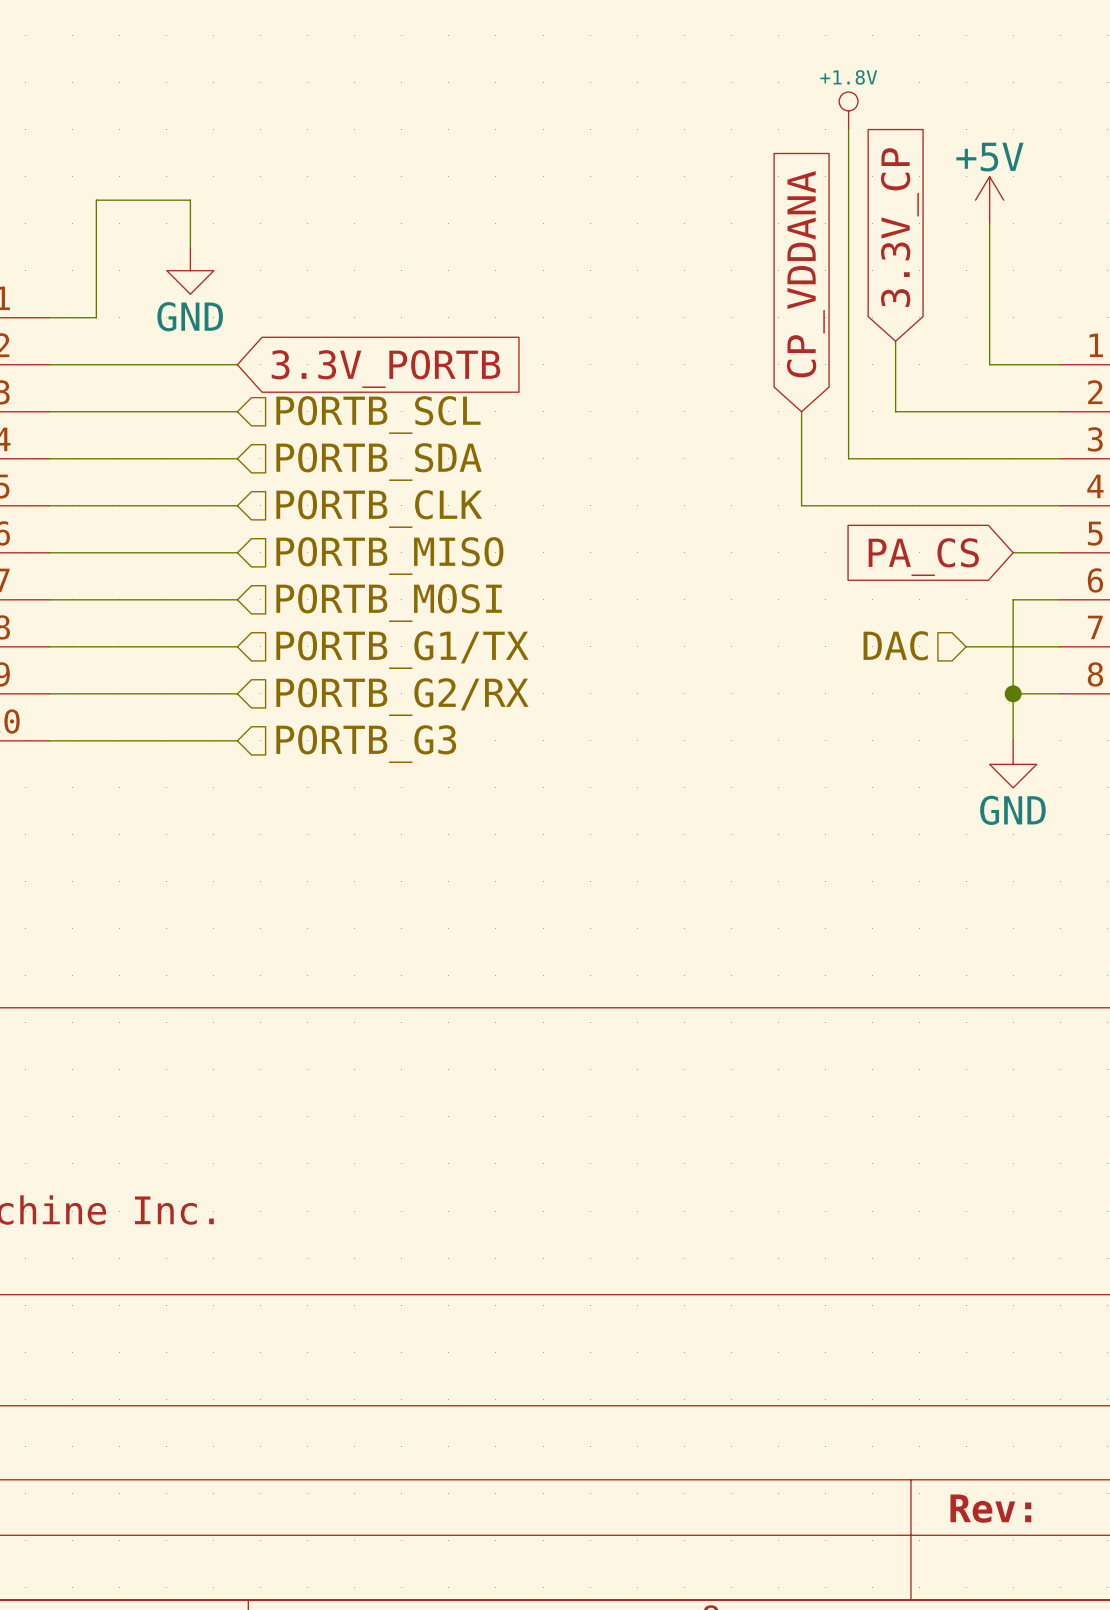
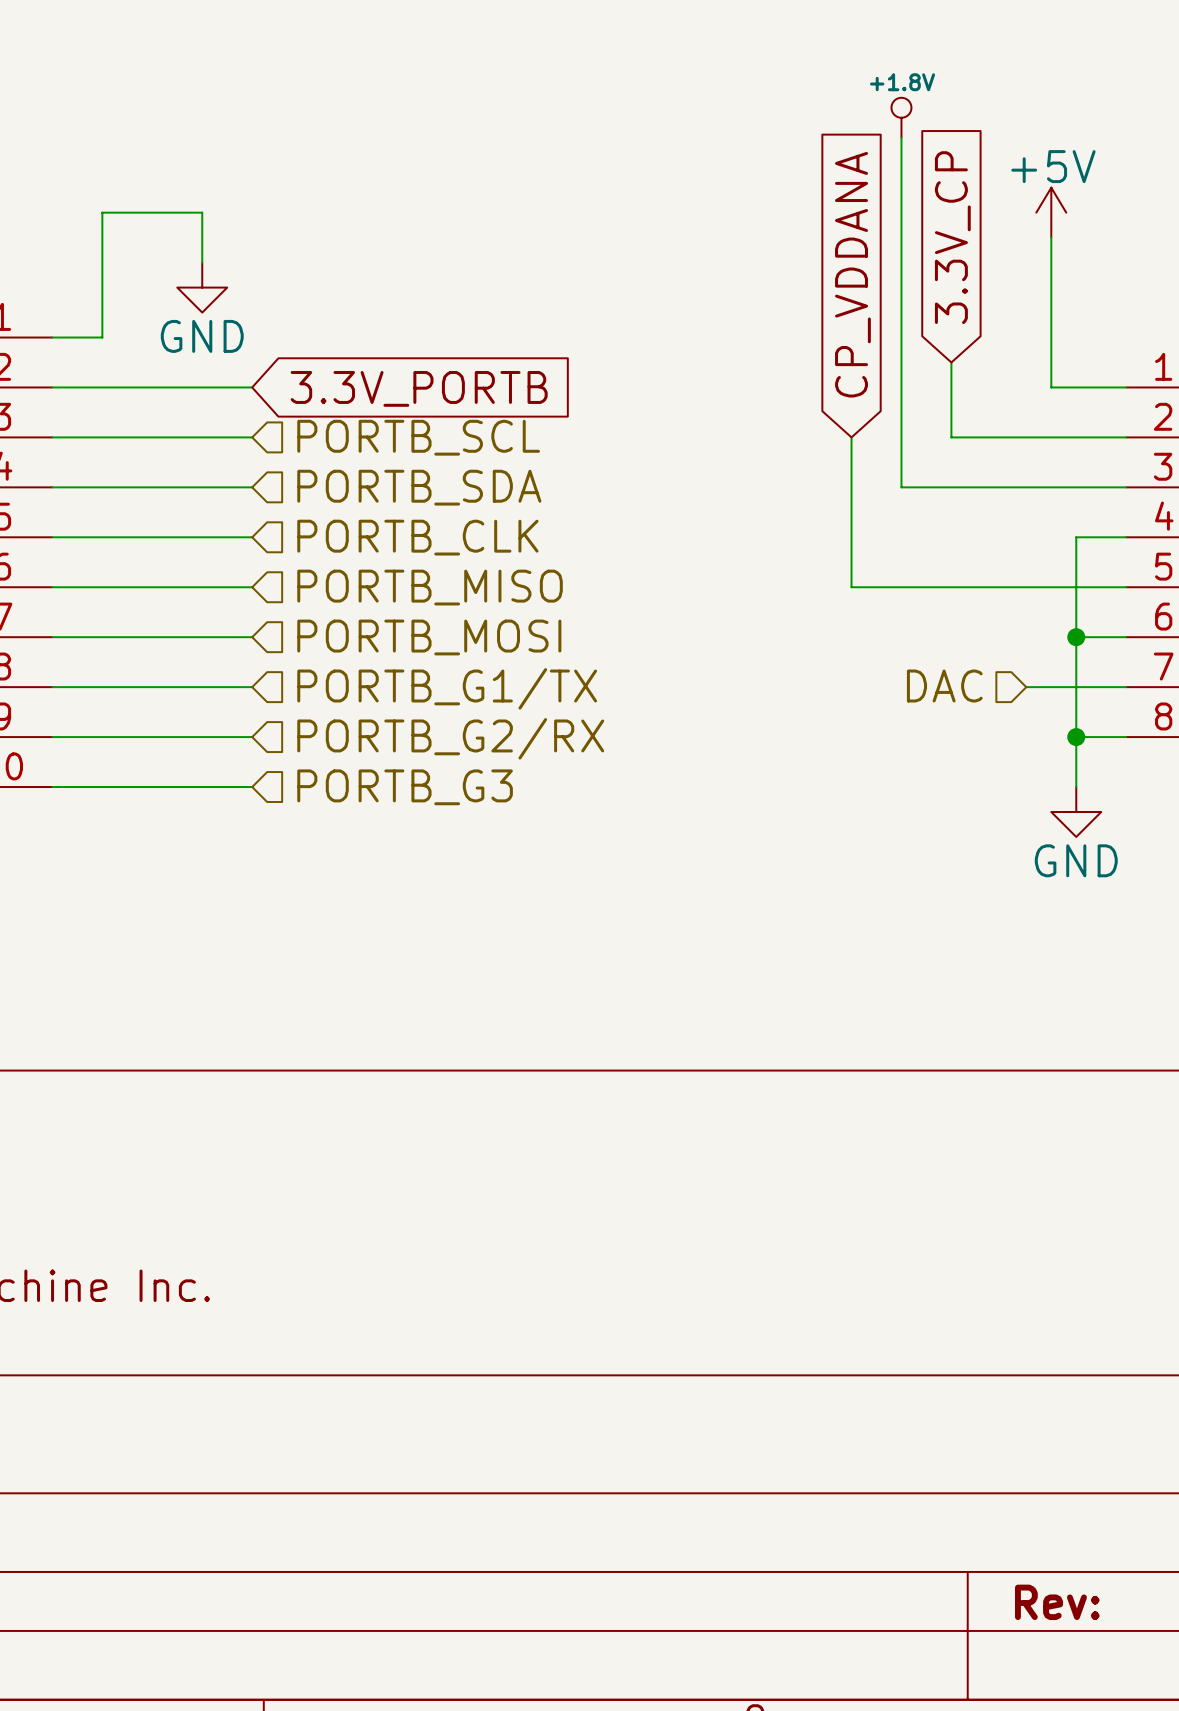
wire: (801, 505) (1013, 505) -> (851, 537) (851, 587) (1076, 587)
wire: none -> (1076, 537) (1076, 637)
global label: PA_CS (923, 557) -> none
junction: none -> (1076, 637)

